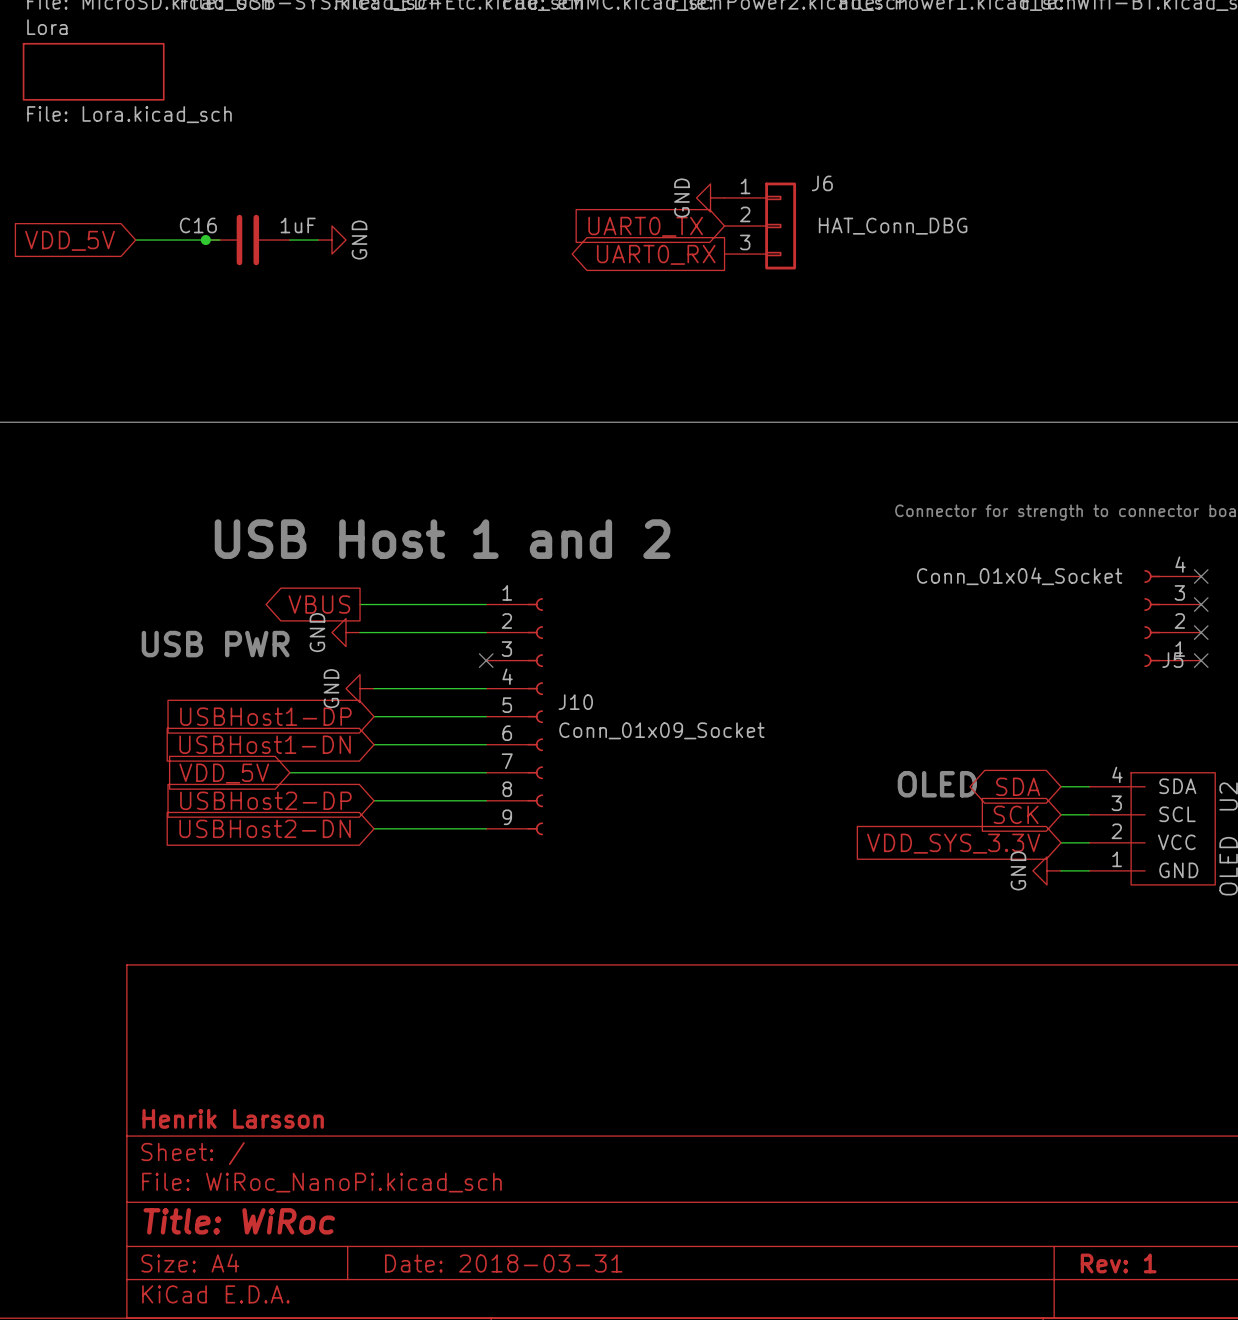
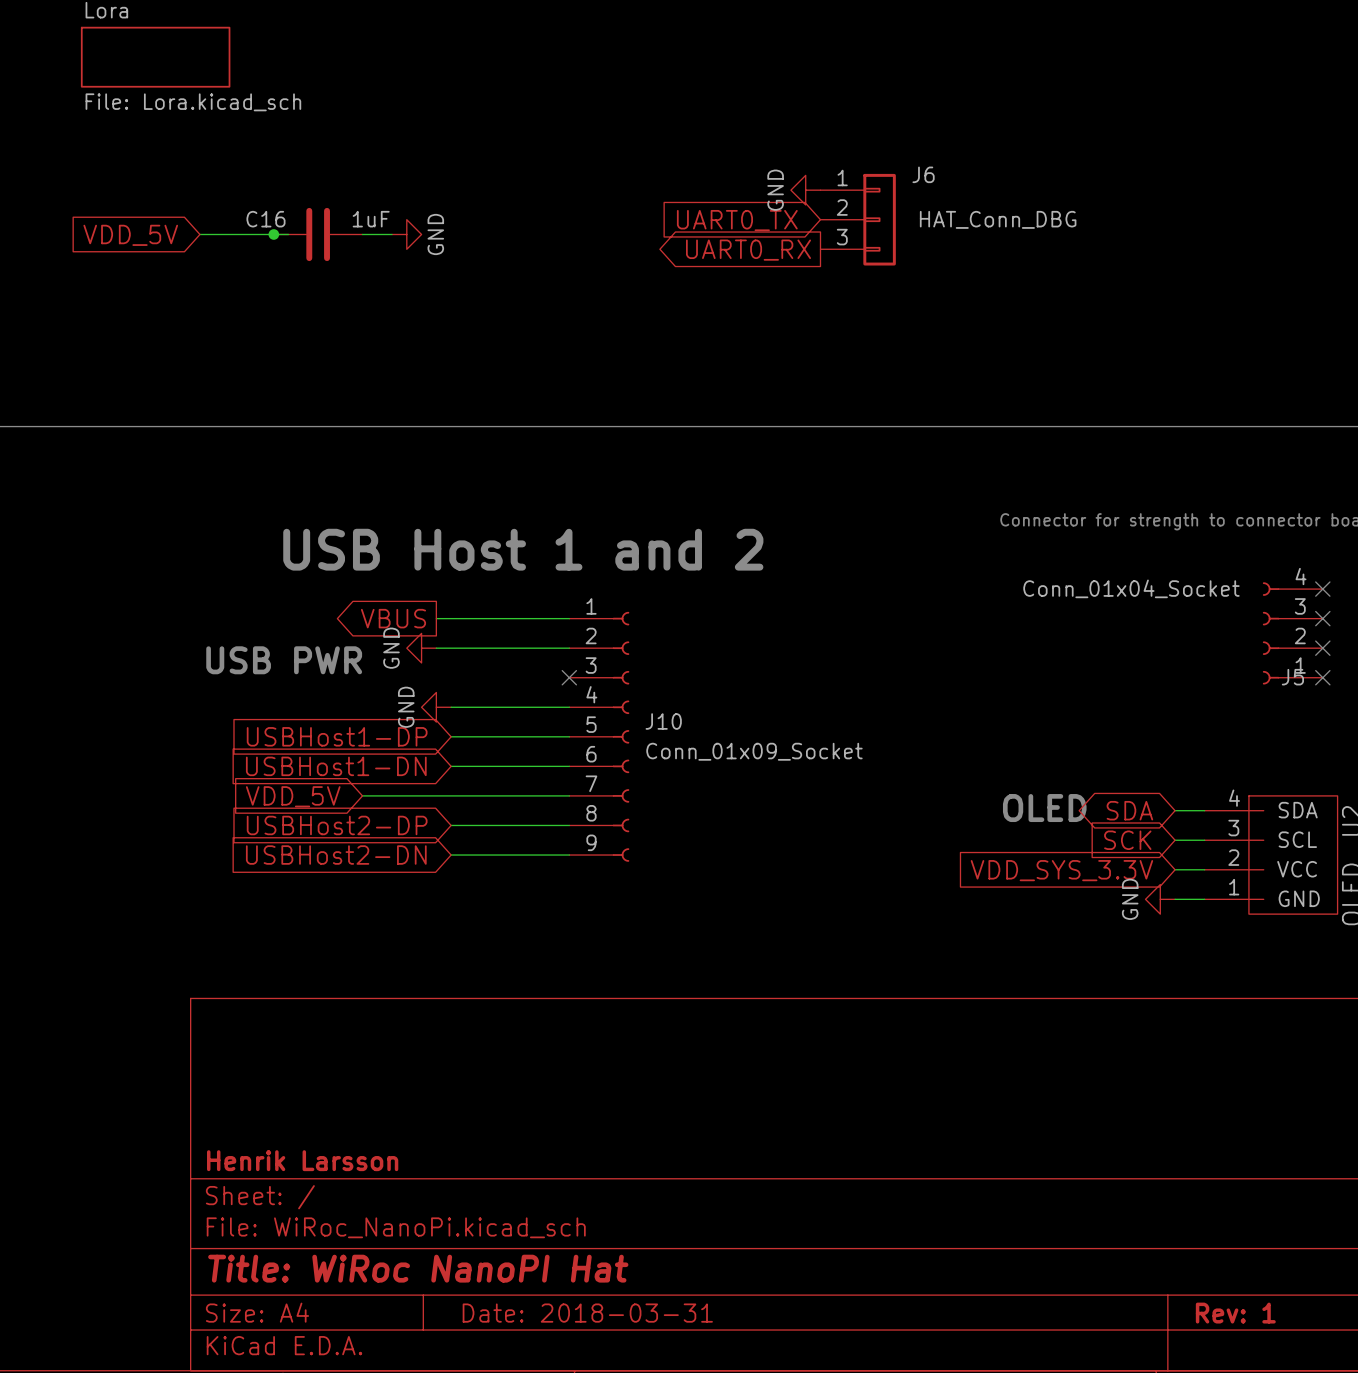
title block: Title: WiRoc (239, 1221) -> Title: WiRoc NanoPI Hat (418, 1268)

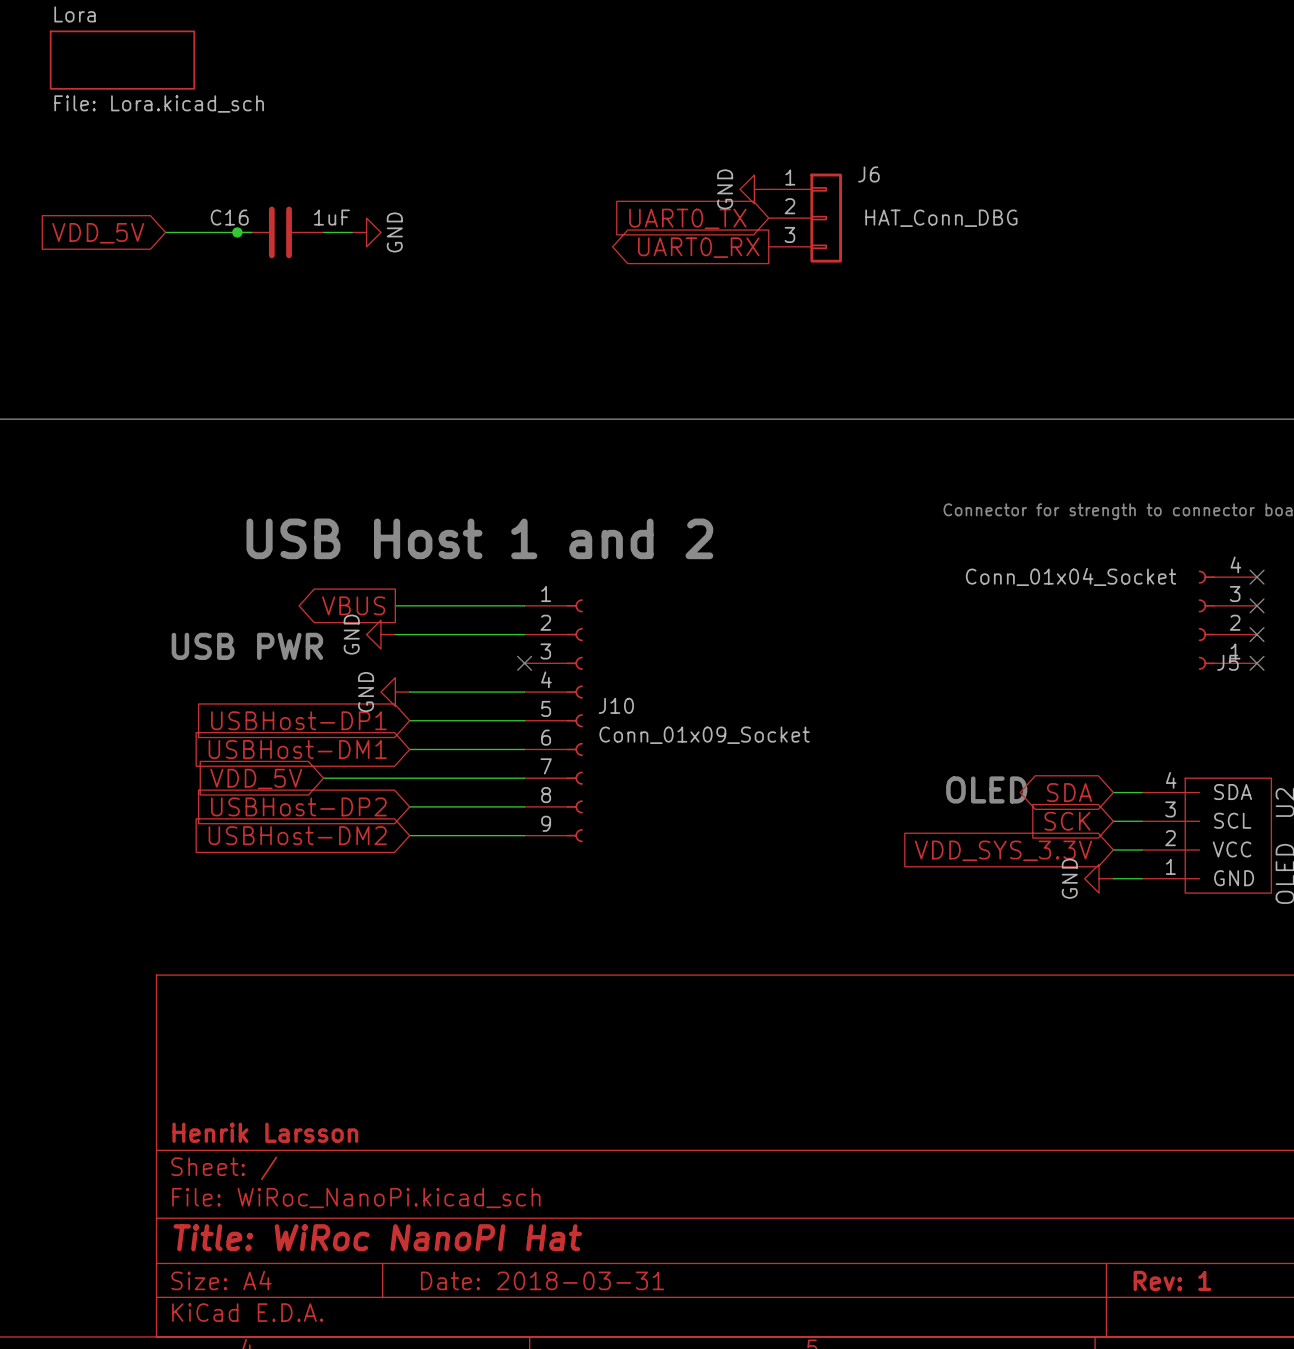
global label: USBHost1-DP (337, 736) -> USBHost-DP1 (298, 720)
global label: USBHost1-DN (336, 766) -> USBHost-DM1 (297, 749)
global label: USBHost2-DP (337, 825) -> USBHost-DP2 (298, 806)
global label: USBHost2-DN (336, 855) -> USBHost-DM2 (297, 835)

